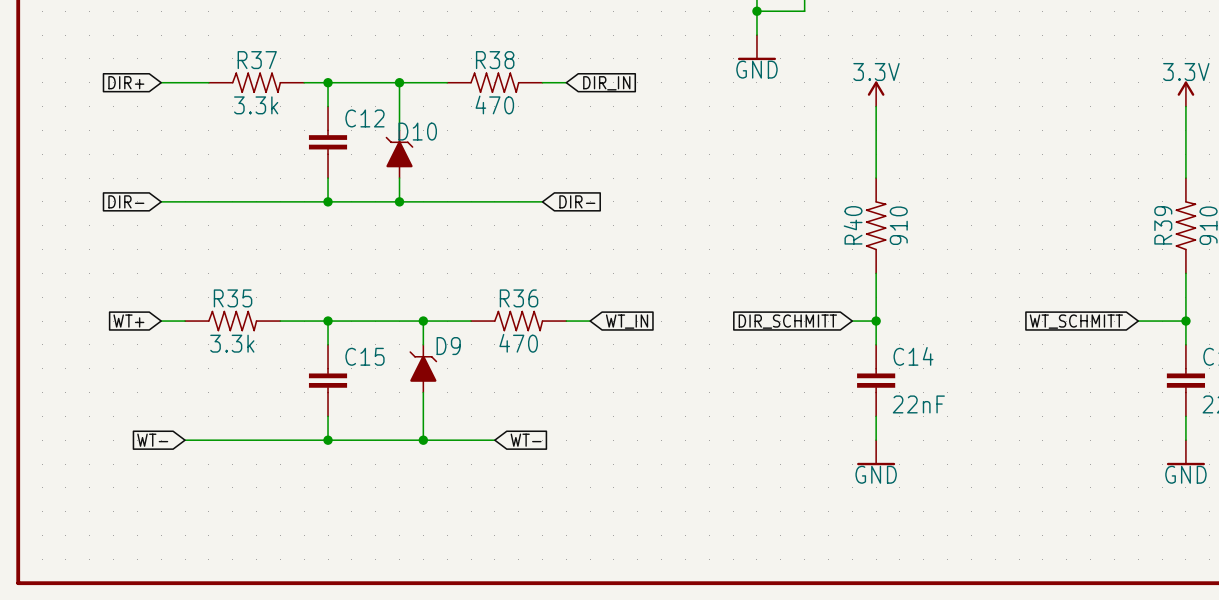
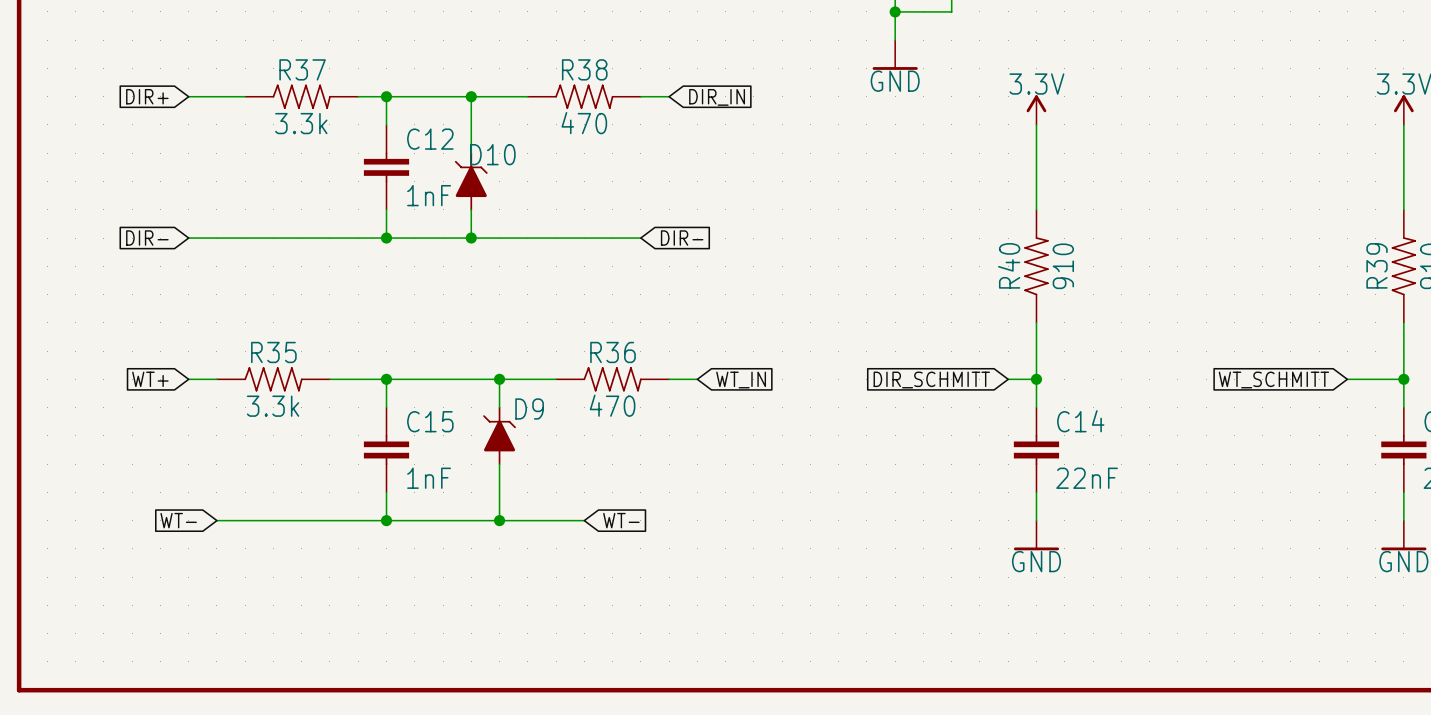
C12 value: none -> 1nF (429, 195)
C15 value: none -> 1nF (429, 478)

